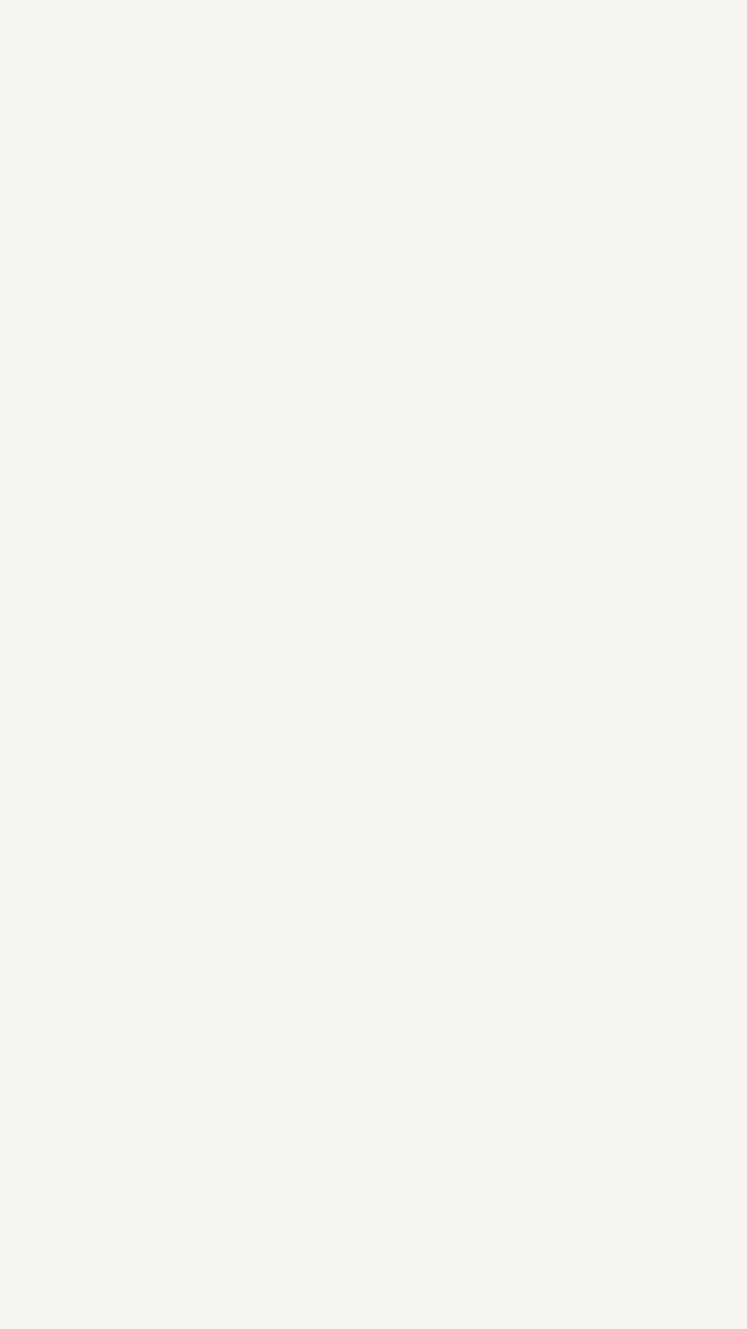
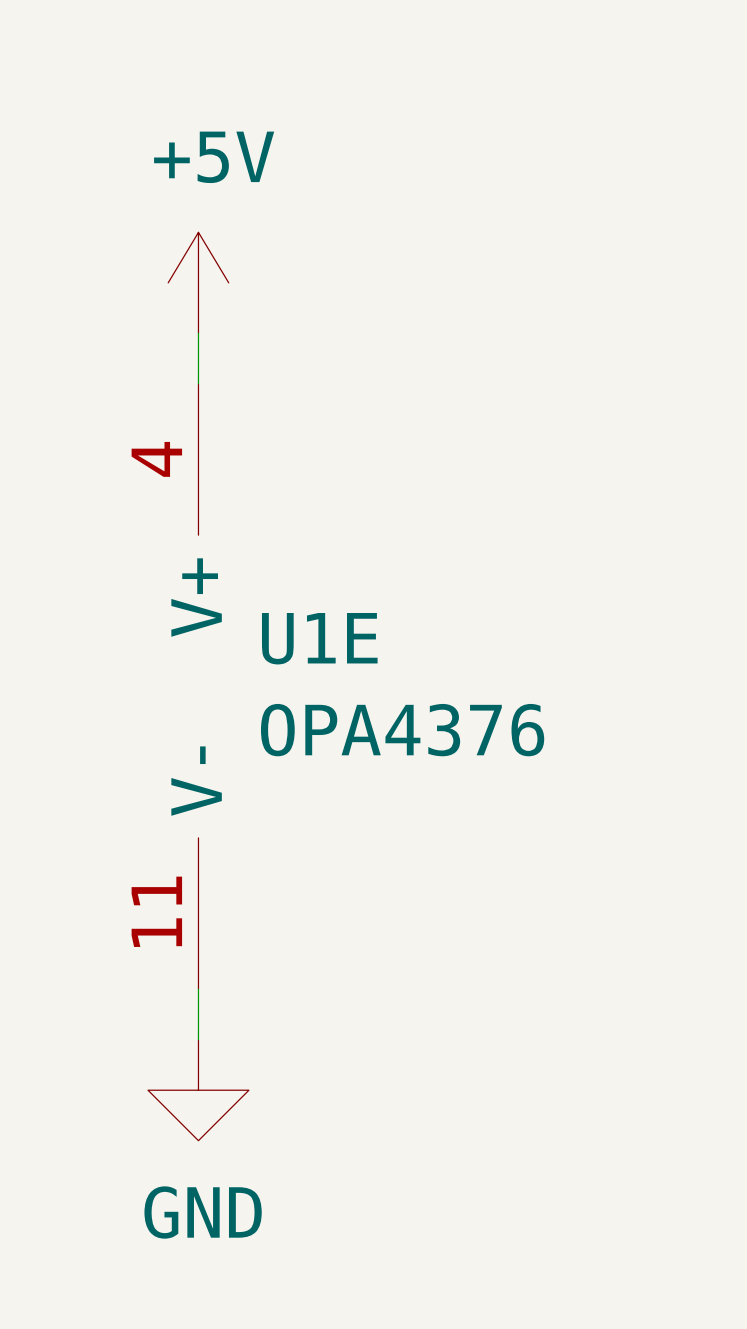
power symbol: none -> +5V (198, 282)
wire: none -> (198, 333) (198, 383)
U1E: none -> OPA4376 (198, 686)
wire: none -> (198, 989) (198, 1039)
power symbol: none -> GND (198, 1090)

